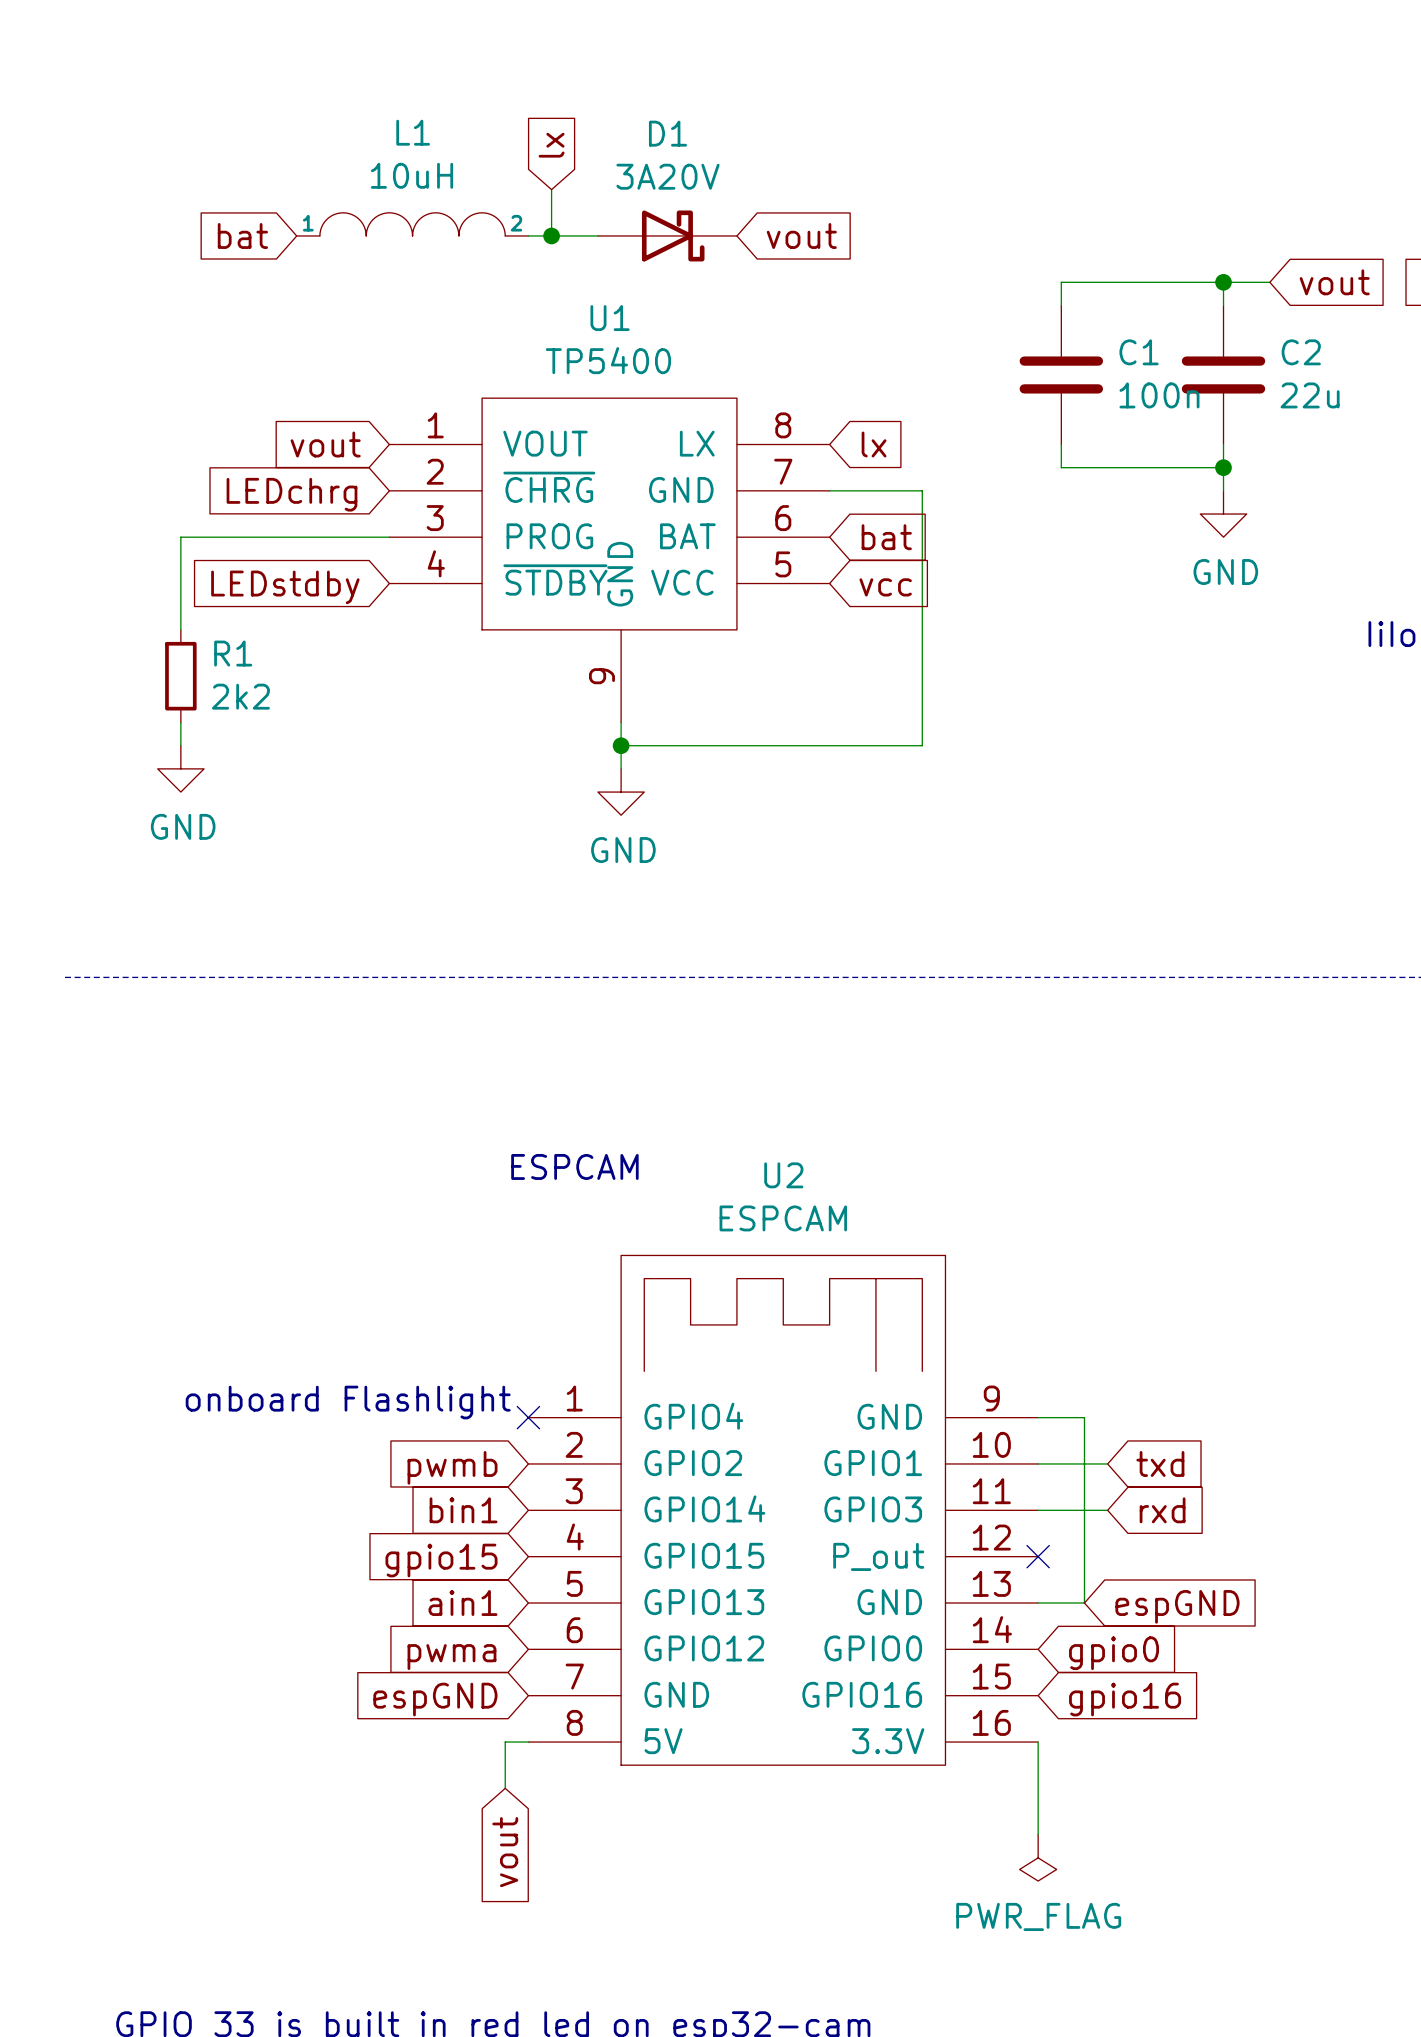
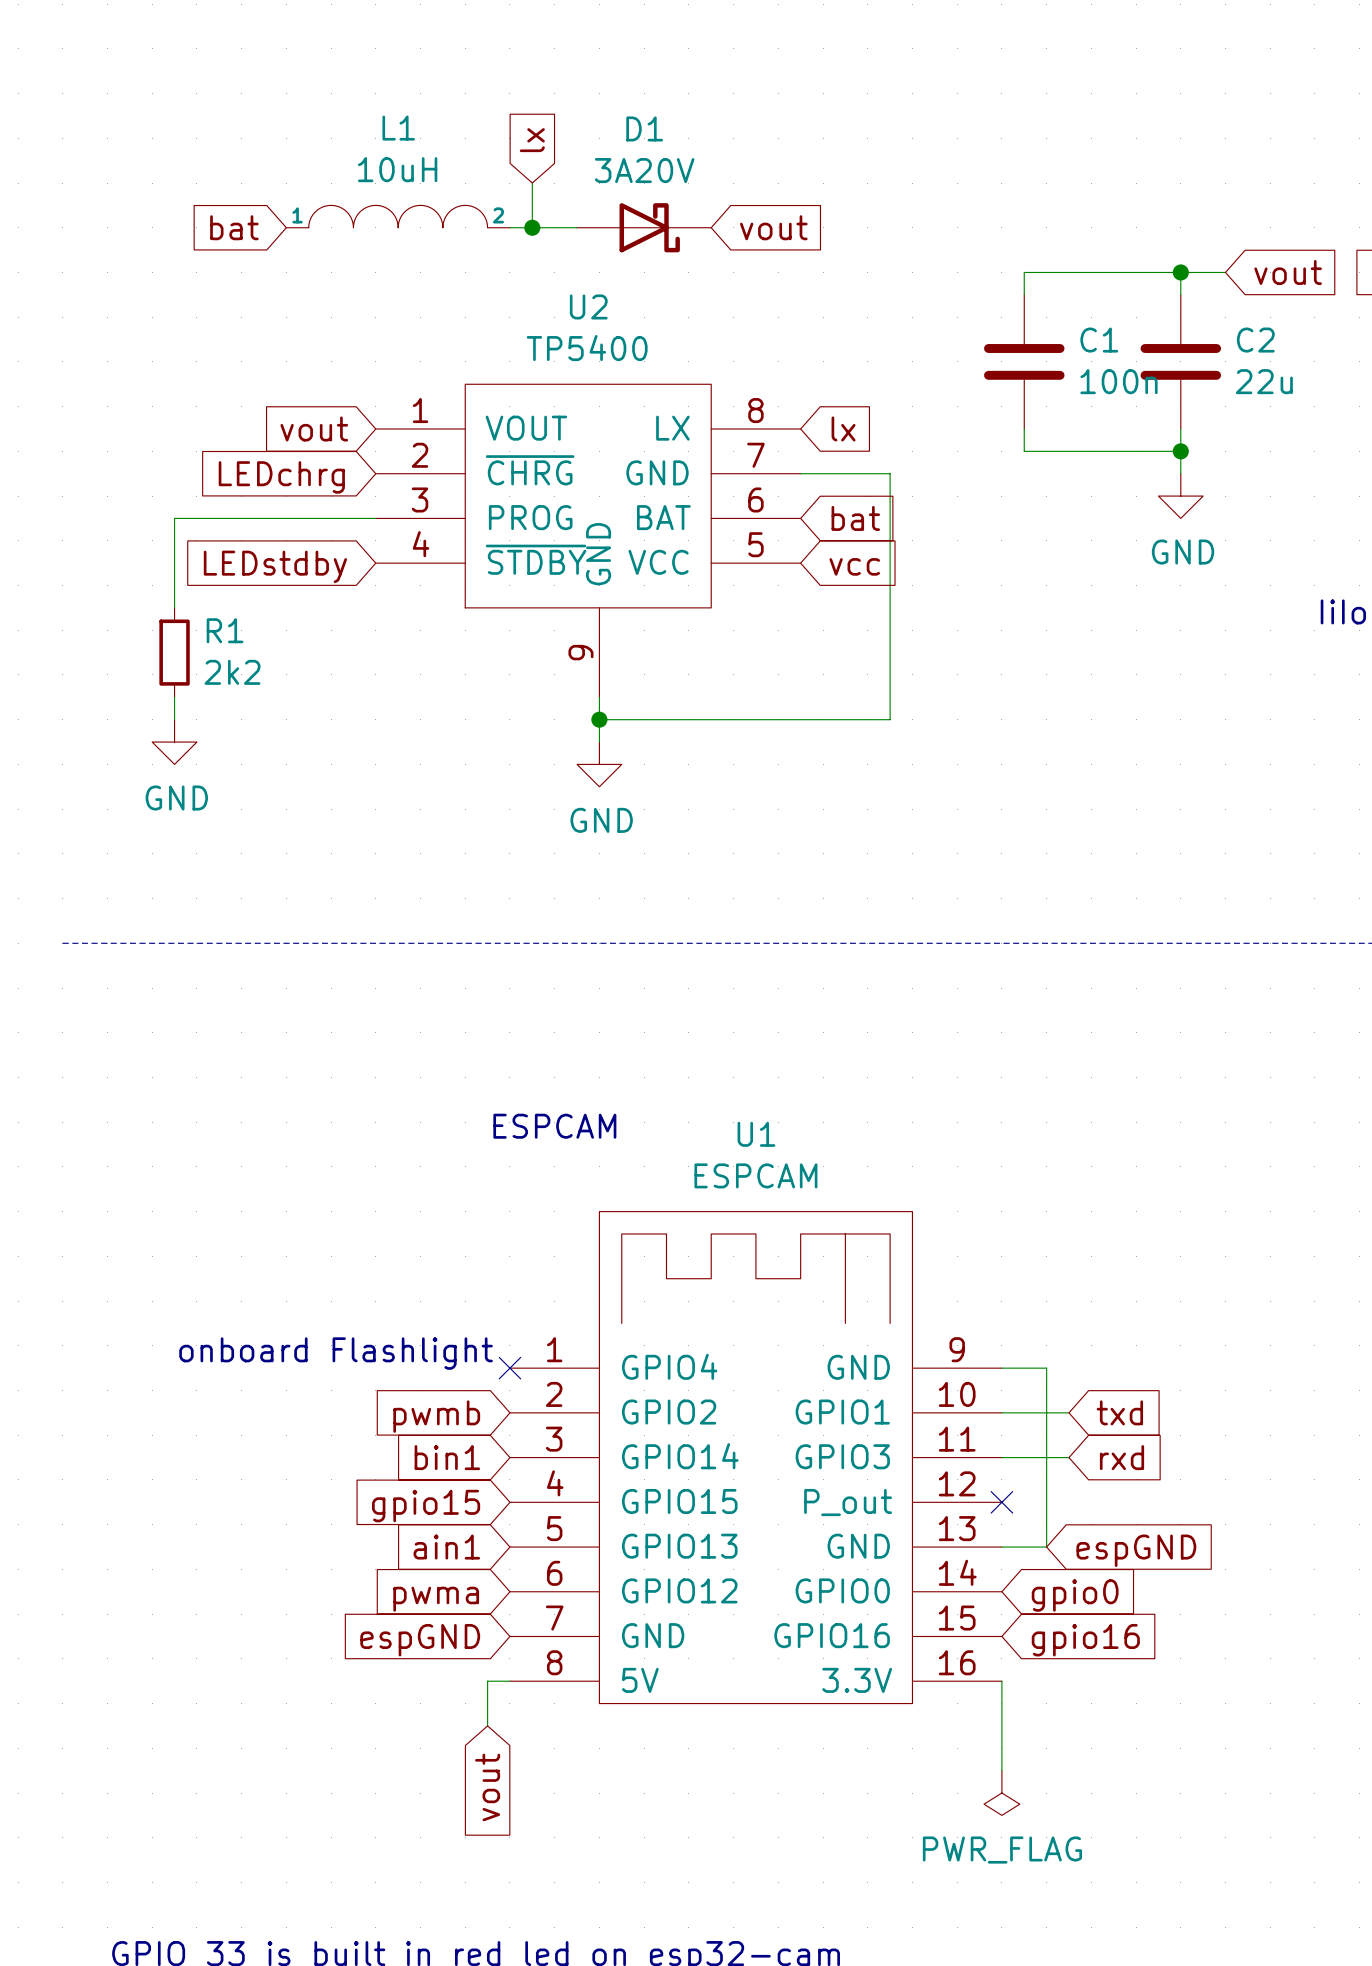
U1 name: U1 (610, 318) -> U2 (588, 306)
U2 name: U2 (783, 1175) -> U1 (756, 1134)

